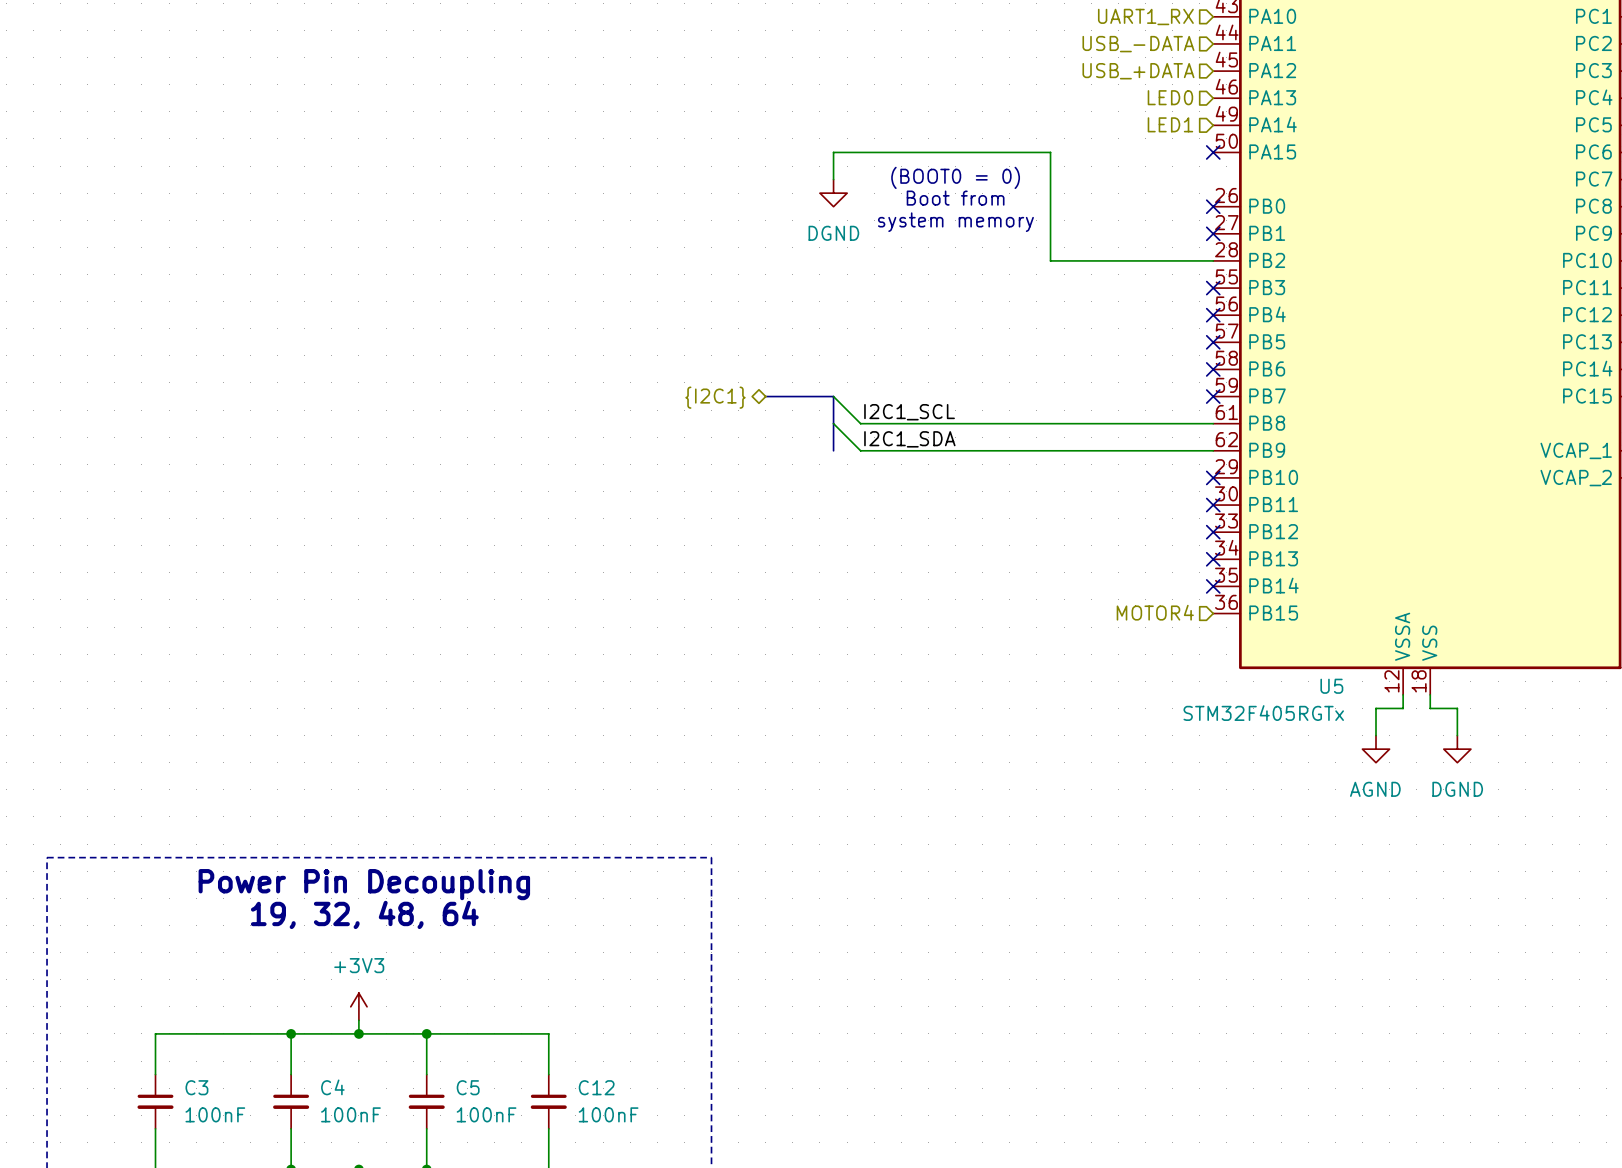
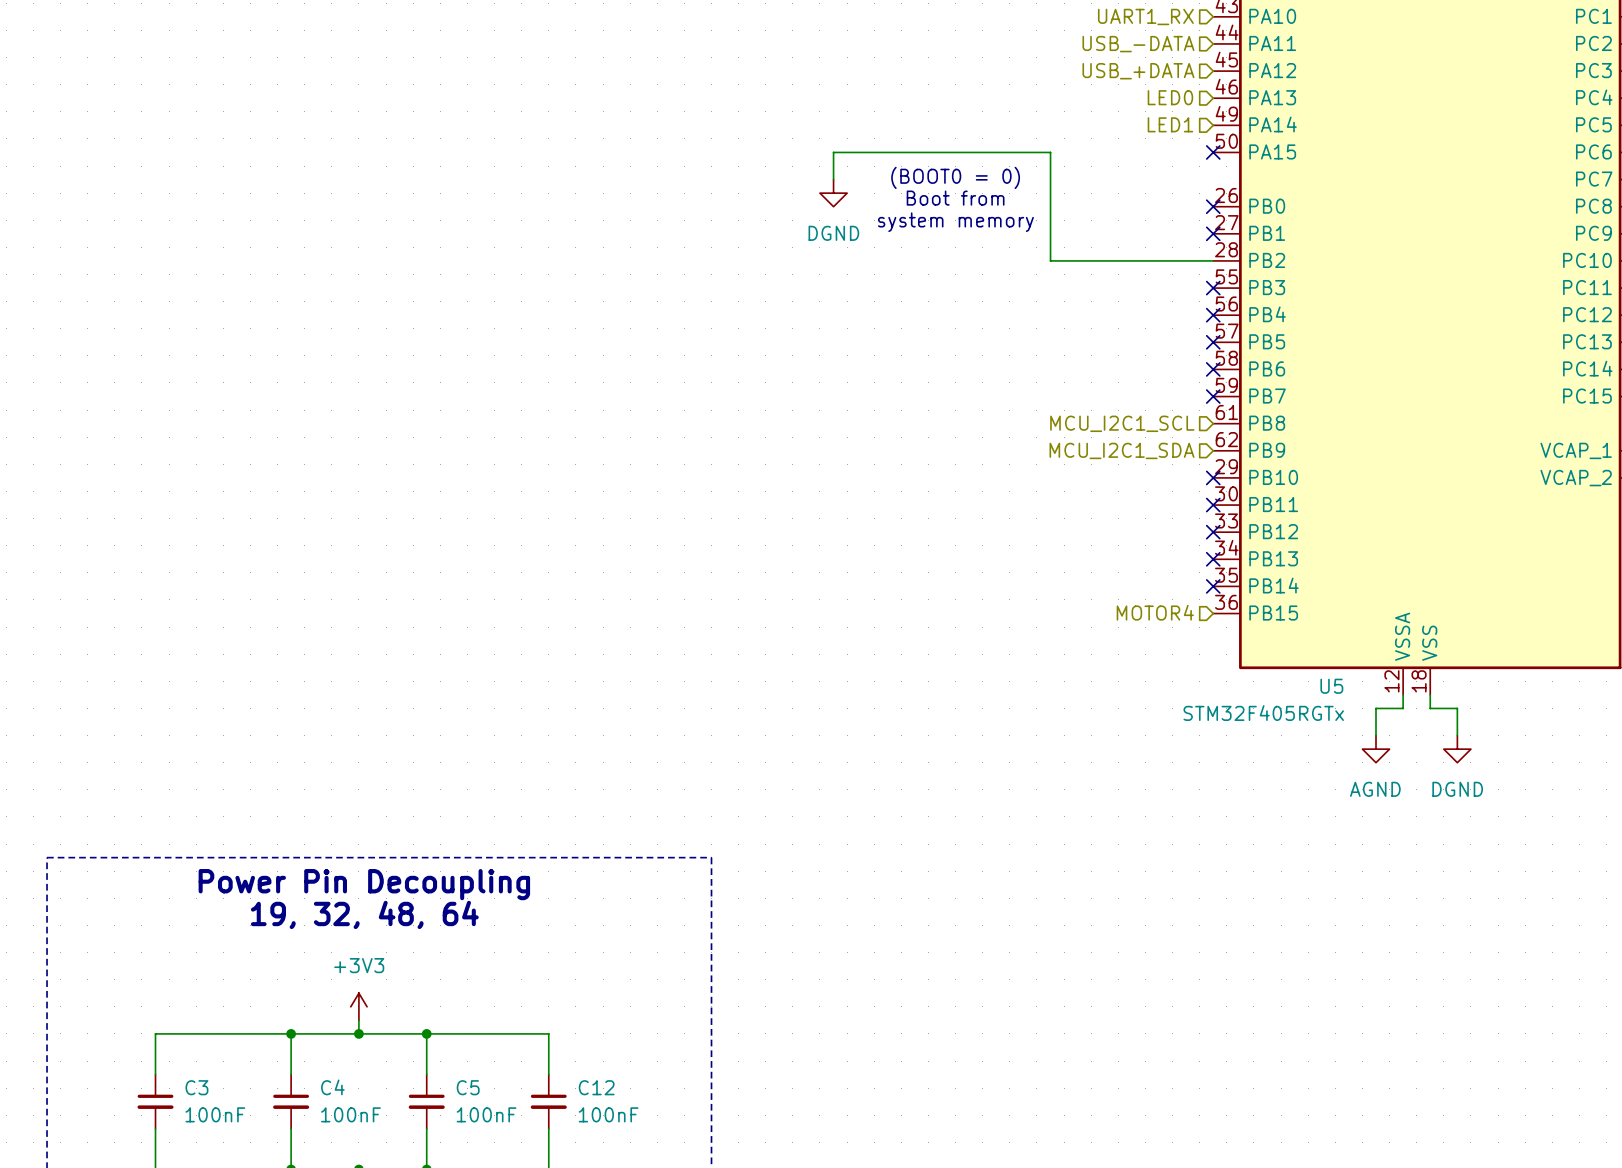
bus: (765, 396) (833, 396) (833, 450) -> none
wire: (833, 396) (860, 423) (1213, 423) -> none
hierarchical label: {I2C1} (715, 397) -> none
label: I2C1_SCL (909, 412) -> none
wire: (833, 423) (860, 450) (1213, 450) -> none
hierarchical label: none -> MCU_I2C1_SCL (1122, 423)
label: I2C1_SDA (909, 439) -> none
hierarchical label: none -> MCU_I2C1_SDA (1122, 450)

